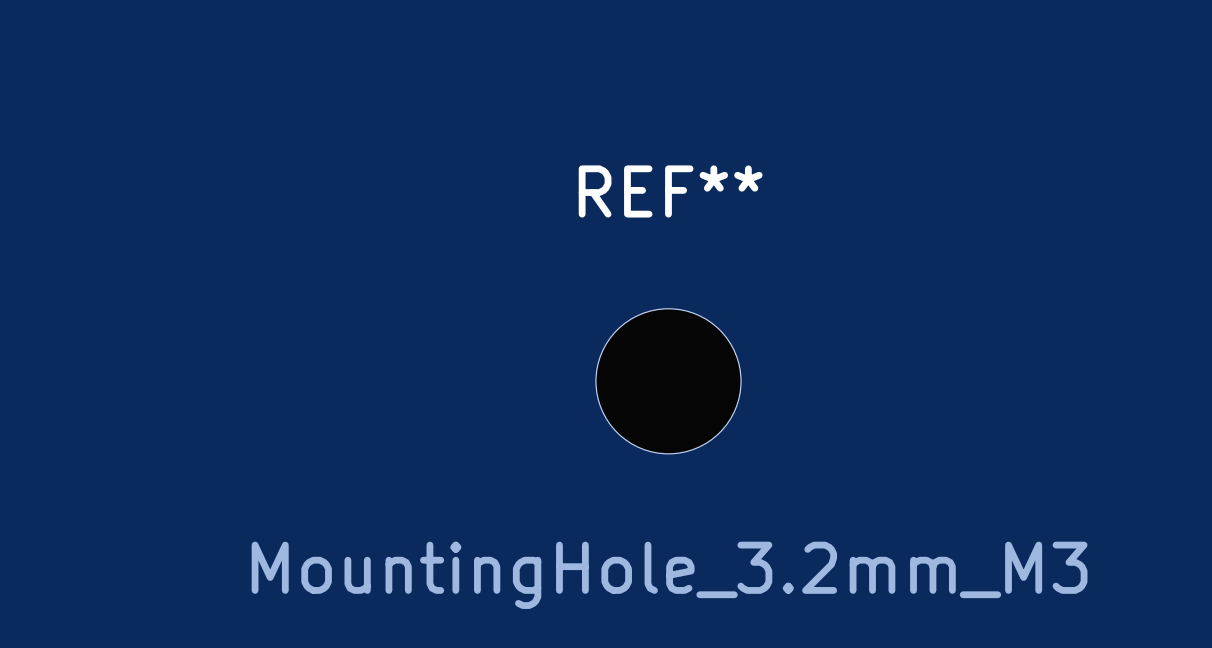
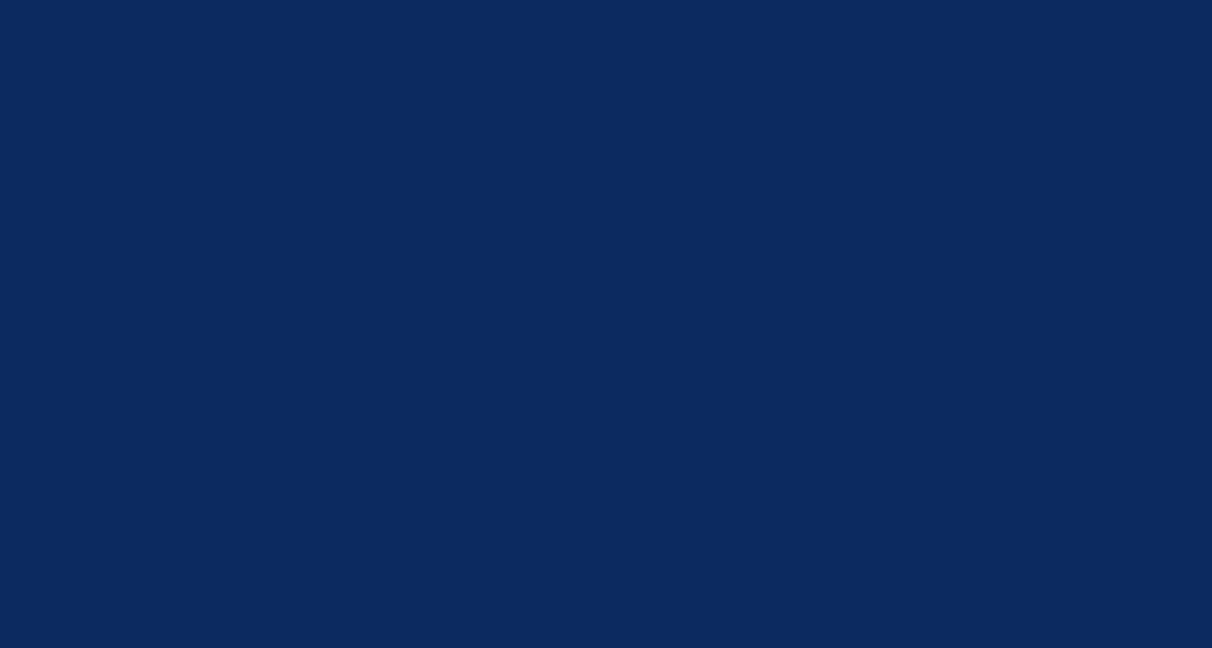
REF**: MountingHole_3.2mm_M3 (668, 381) -> none

